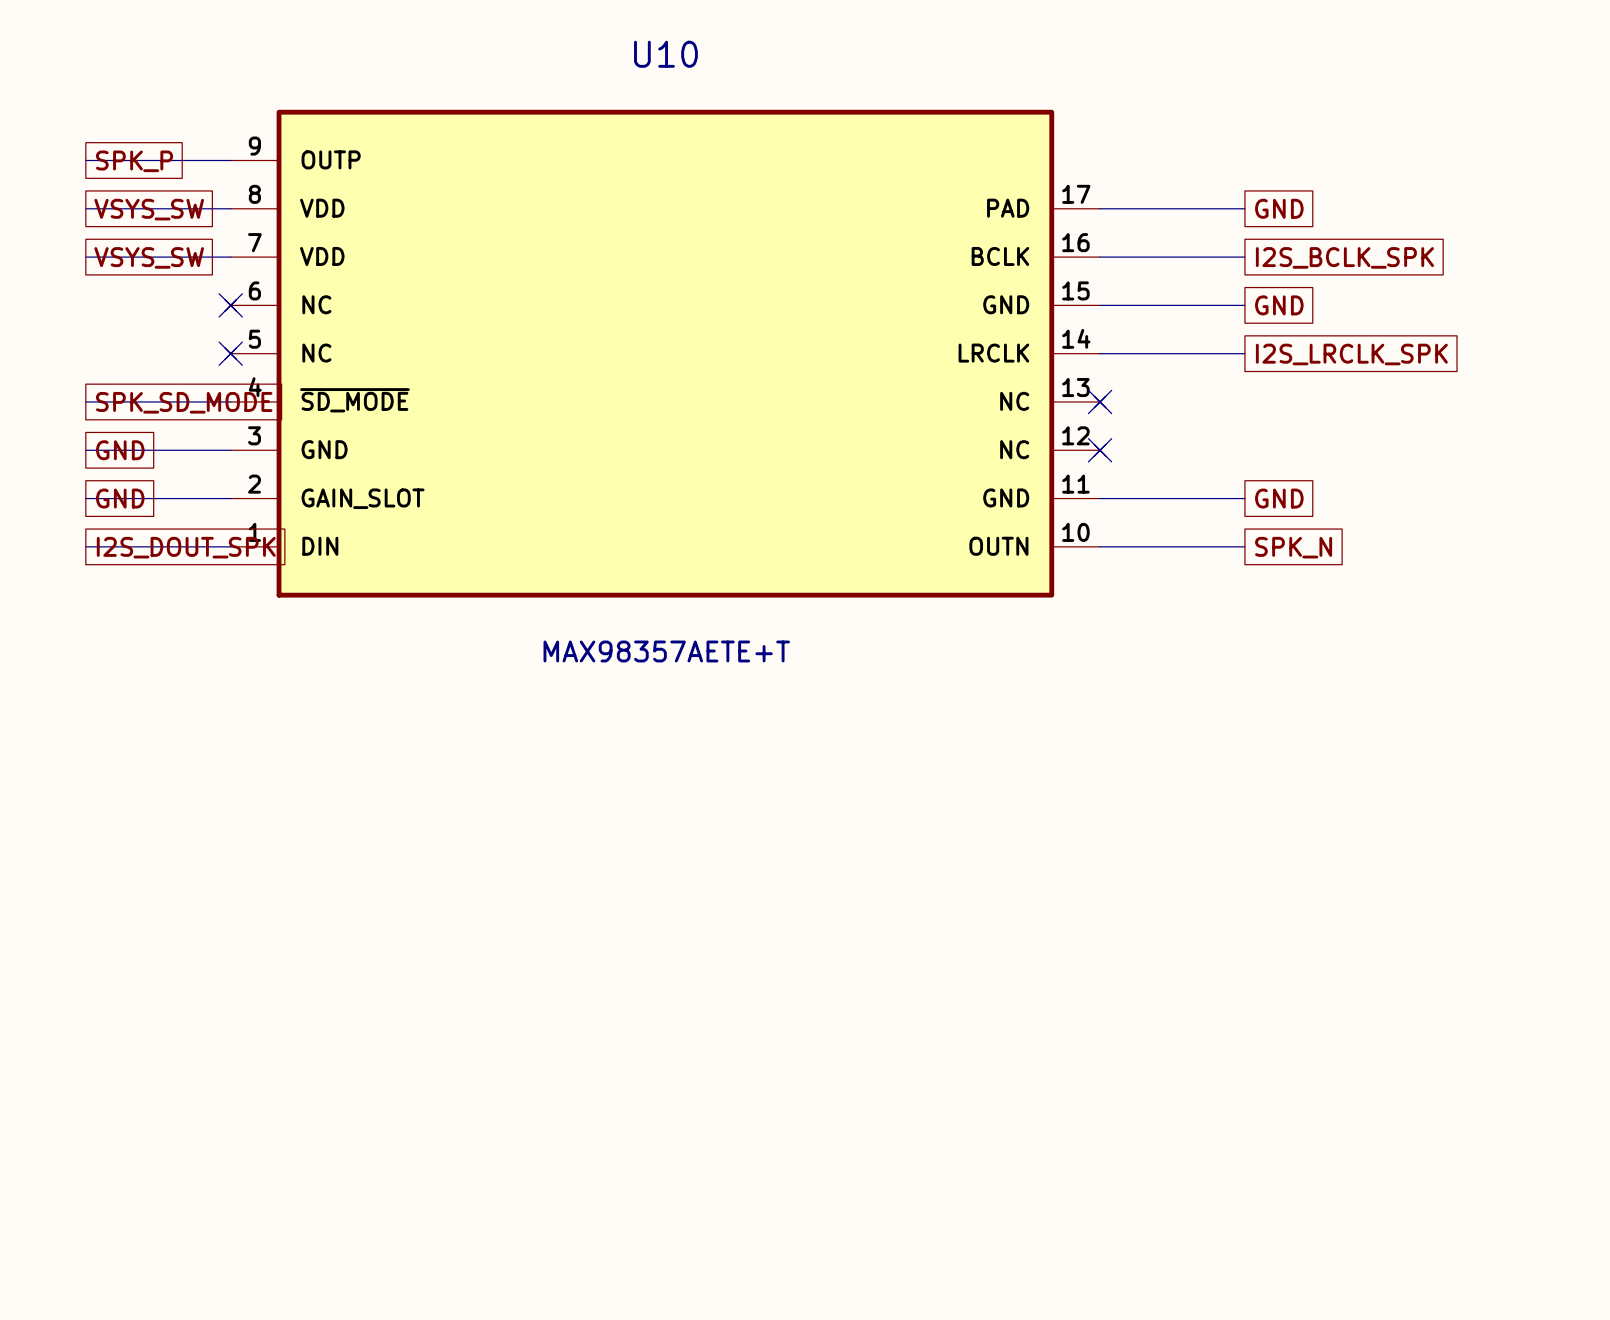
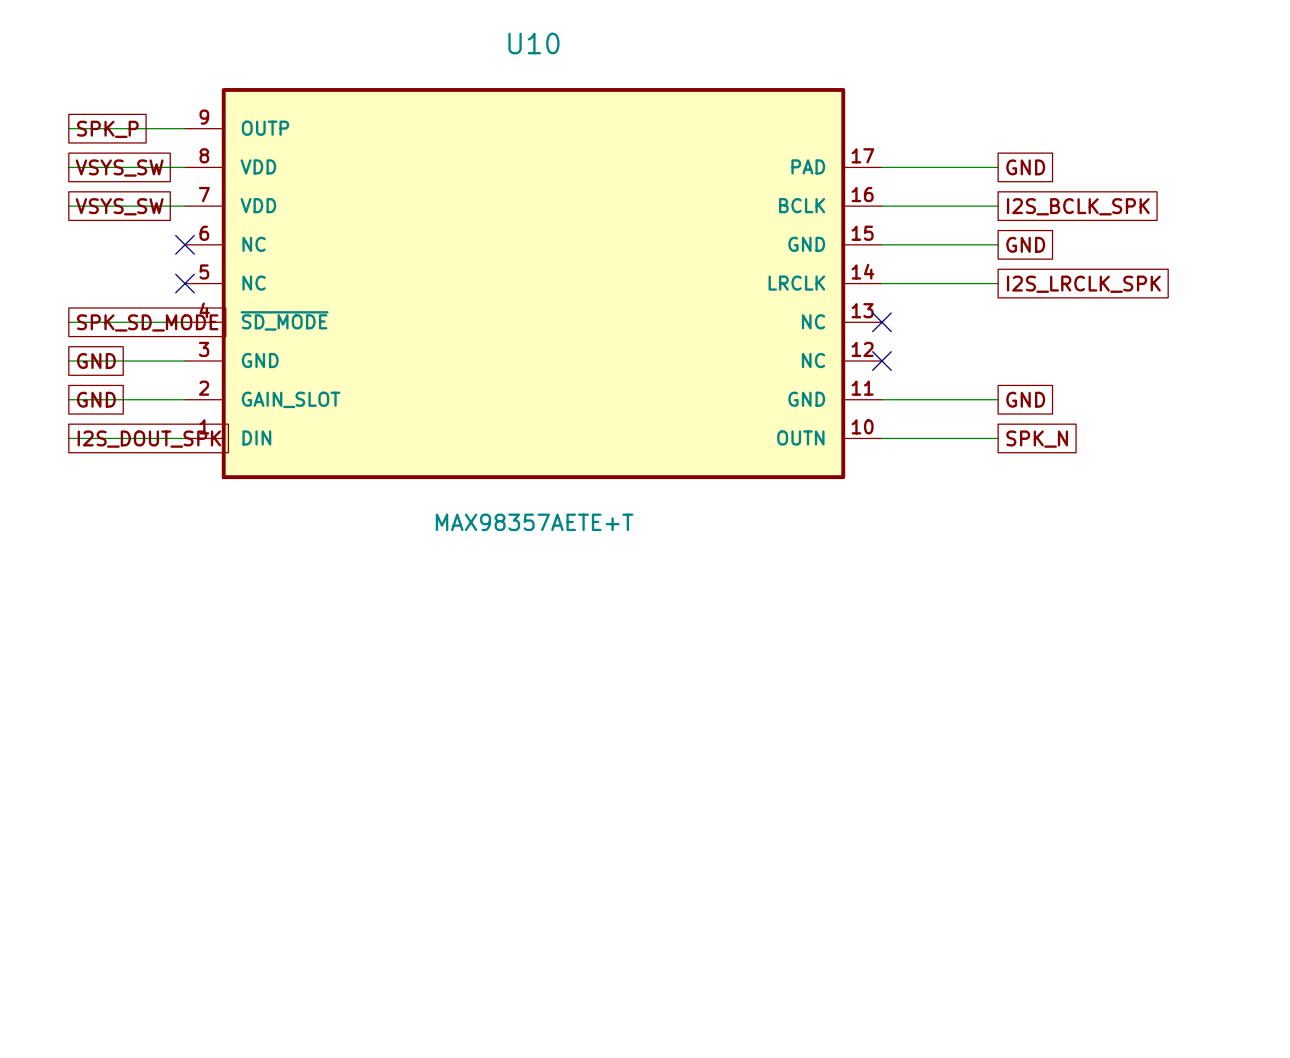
U10 symbol: [225, 109, 1106, 598] -> [184, 88, 882, 480]

